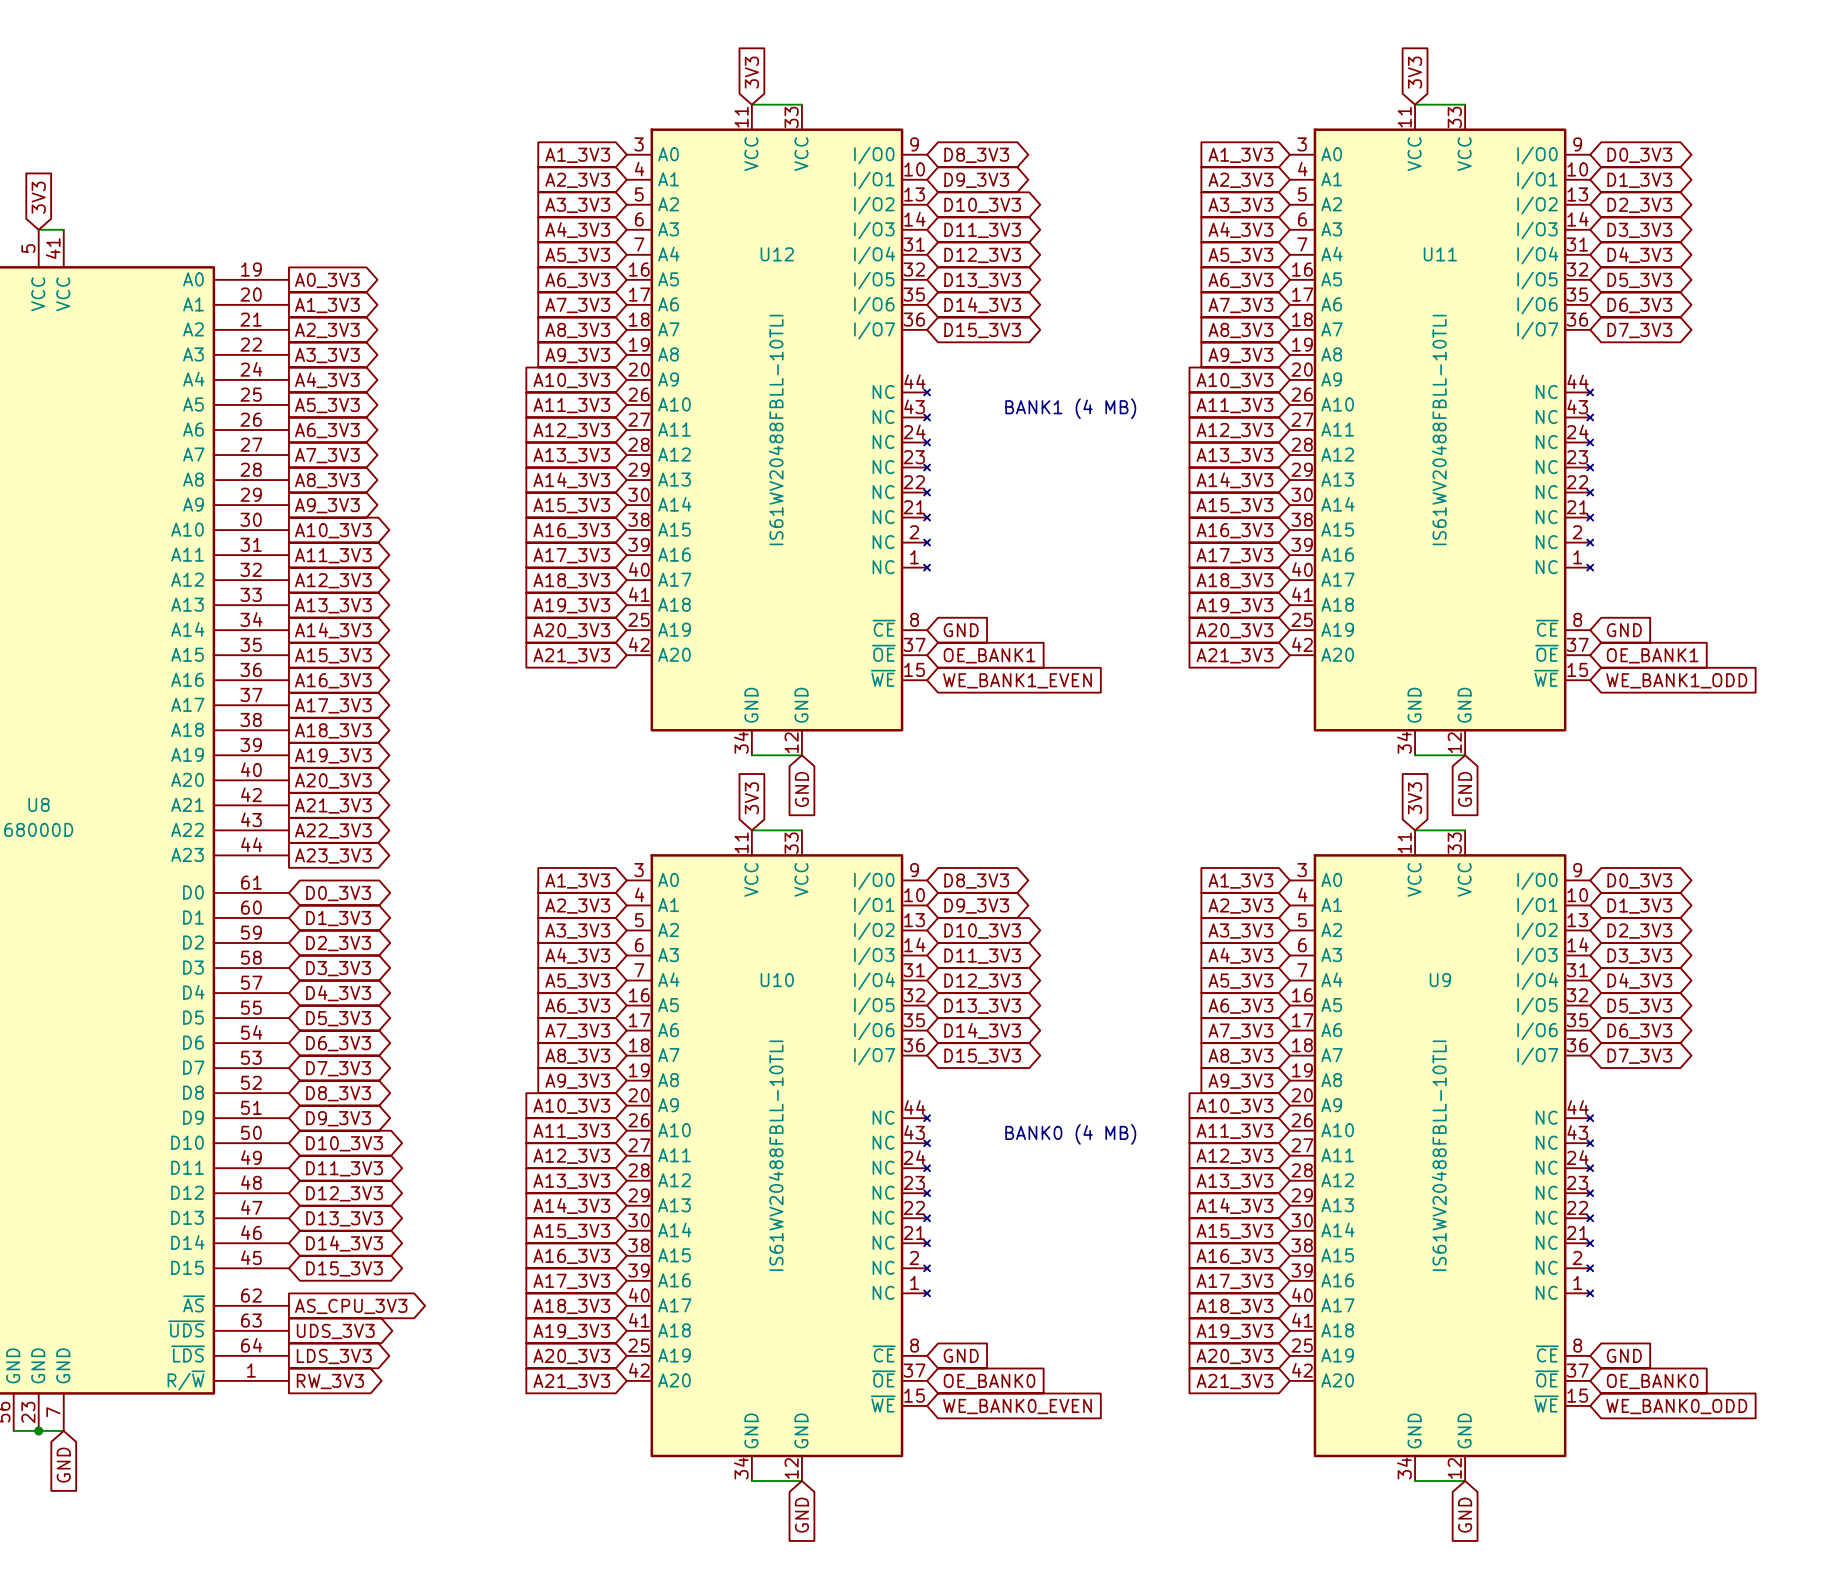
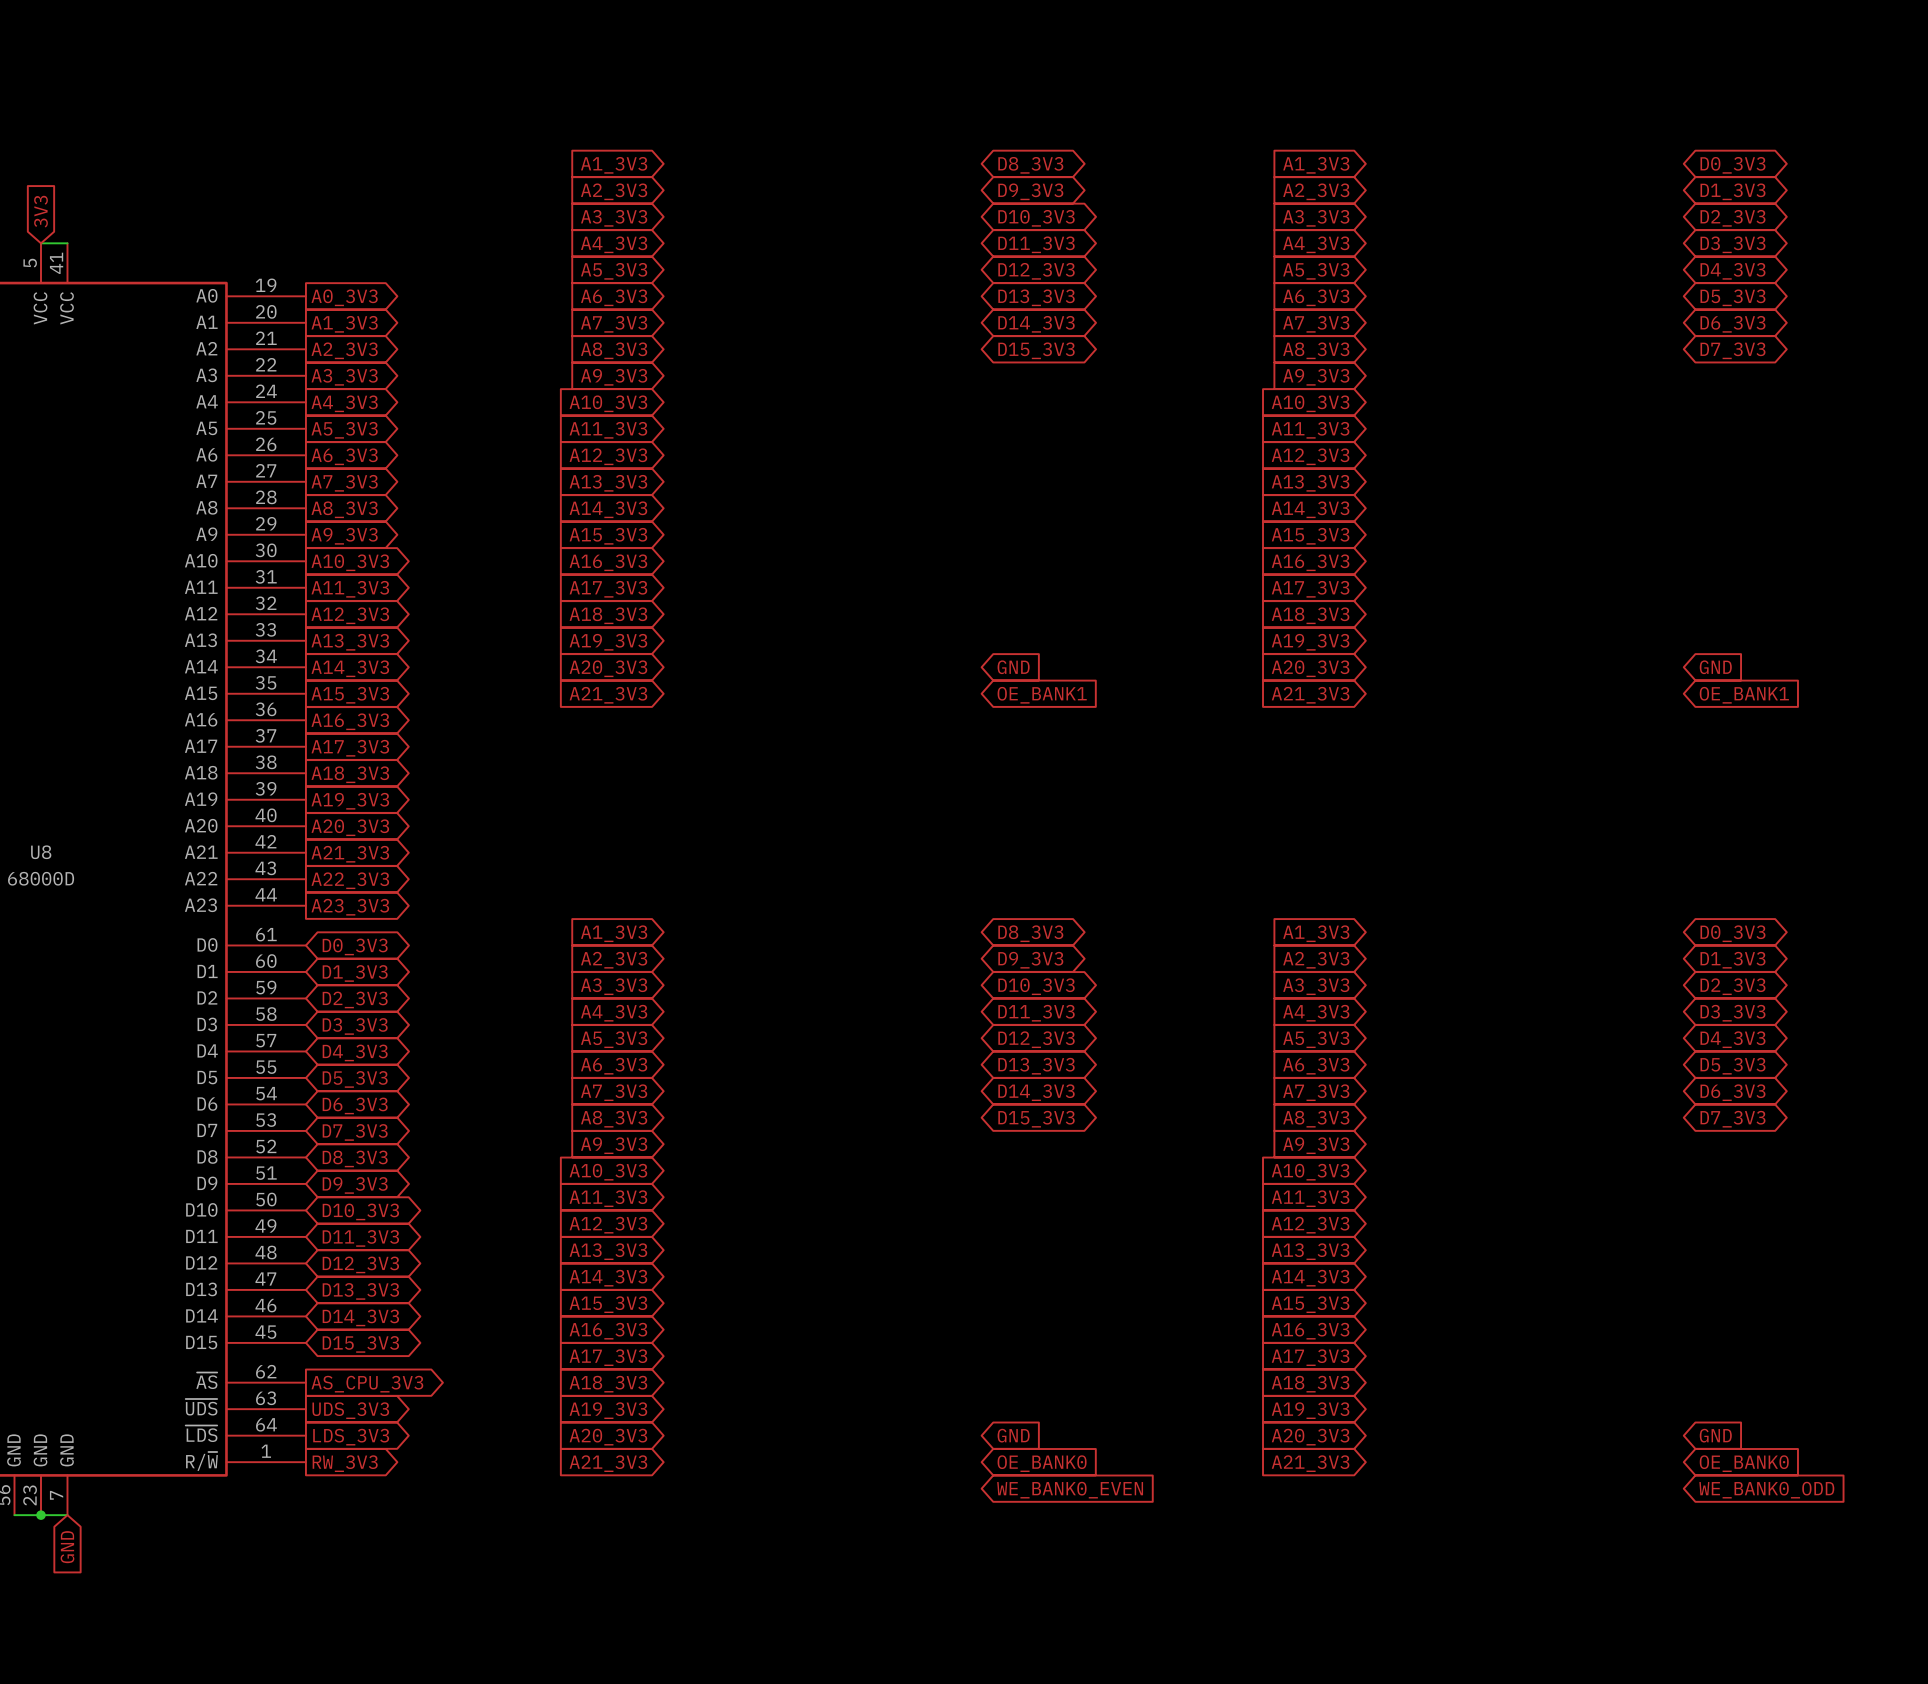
global label: 3V3 (751, 72) -> none
global label: 3V3 (1415, 72) -> none
wire: (751, 104) (801, 104) -> none
wire: (1415, 104) (1465, 104) -> none
text: BANK1 (4 MB) (1070, 408) -> none
U12: IS61WV20488FBLL-10TLI (778, 429) -> none
U11: IS61WV20488FBLL-10TLI (1441, 429) -> none
global label: WE_BANK1_EVEN (1017, 680) -> none
global label: WE_BANK1_ODD (1676, 680) -> none
wire: (751, 755) (801, 755) -> none
wire: (1415, 755) (1465, 755) -> none
global label: GND (801, 789) -> none
global label: GND (1465, 789) -> none
global label: 3V3 (751, 798) -> none
global label: 3V3 (1415, 798) -> none
wire: (751, 830) (801, 830) -> none
wire: (1415, 830) (1465, 830) -> none
text: BANK0 (4 MB) (1070, 1134) -> none
U10: IS61WV20488FBLL-10TLI (778, 1155) -> none
U9: IS61WV20488FBLL-10TLI (1441, 1155) -> none
wire: (751, 1481) (801, 1481) -> none
wire: (1415, 1481) (1465, 1481) -> none
global label: GND (801, 1515) -> none
global label: GND (1465, 1515) -> none

